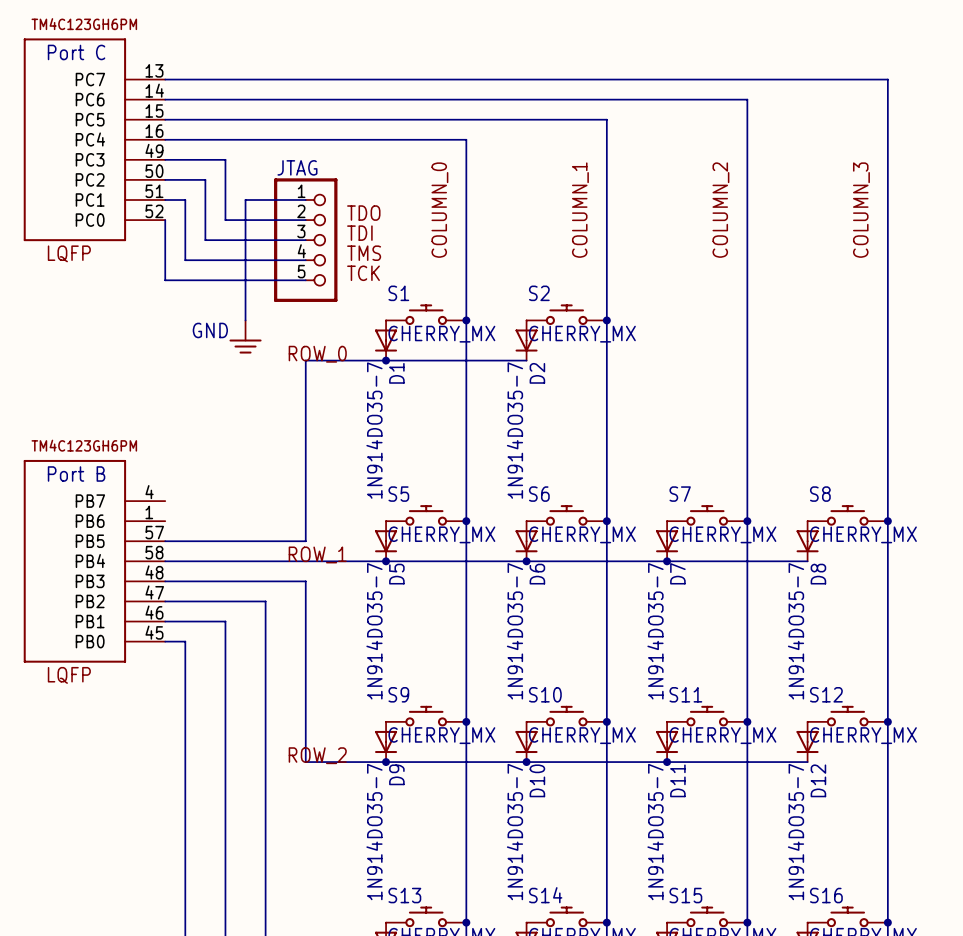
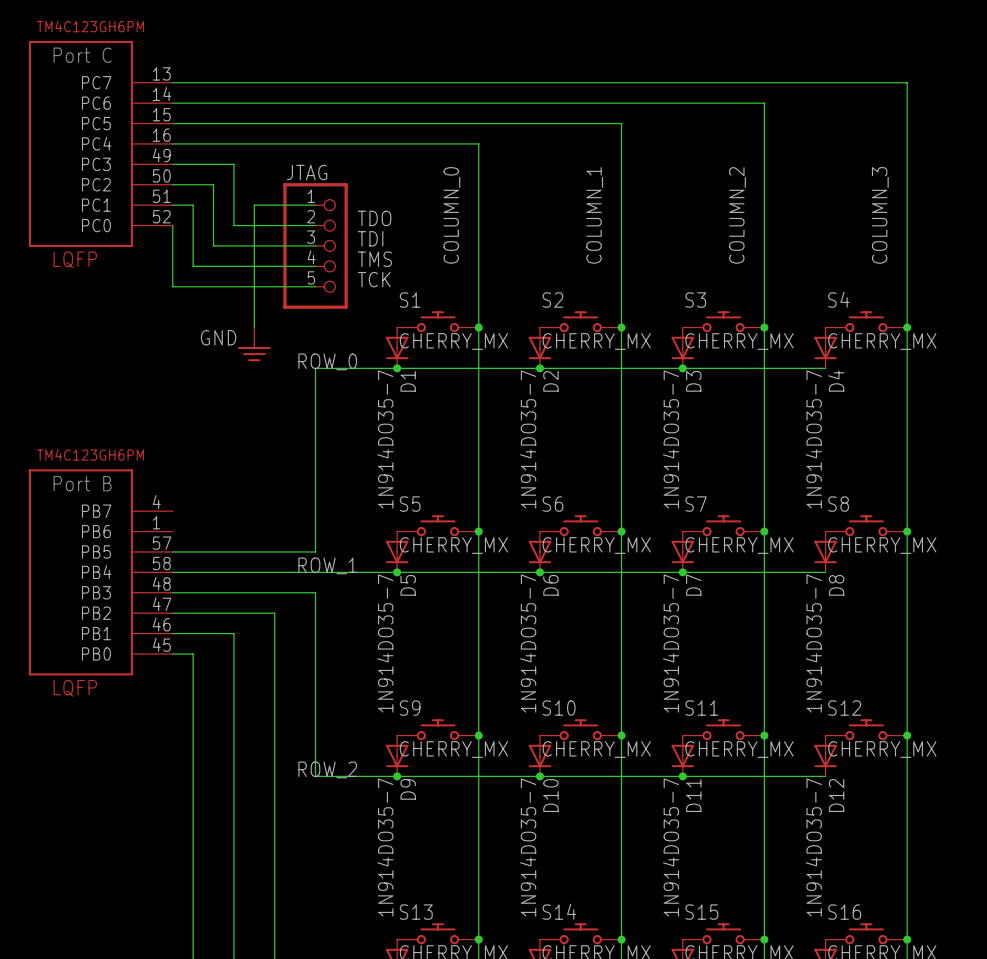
S3: none -> CHERRY_MX (723, 321)
S4: none -> CHERRY_MX (866, 321)
junction: none -> (764, 327)
junction: none -> (907, 327)
D3: none -> 1N914DO35-7 (682, 347)
D4: none -> 1N914DO35-7 (825, 347)
wire: none -> (539, 368) (825, 368)
junction: none -> (539, 368)
junction: none -> (682, 368)

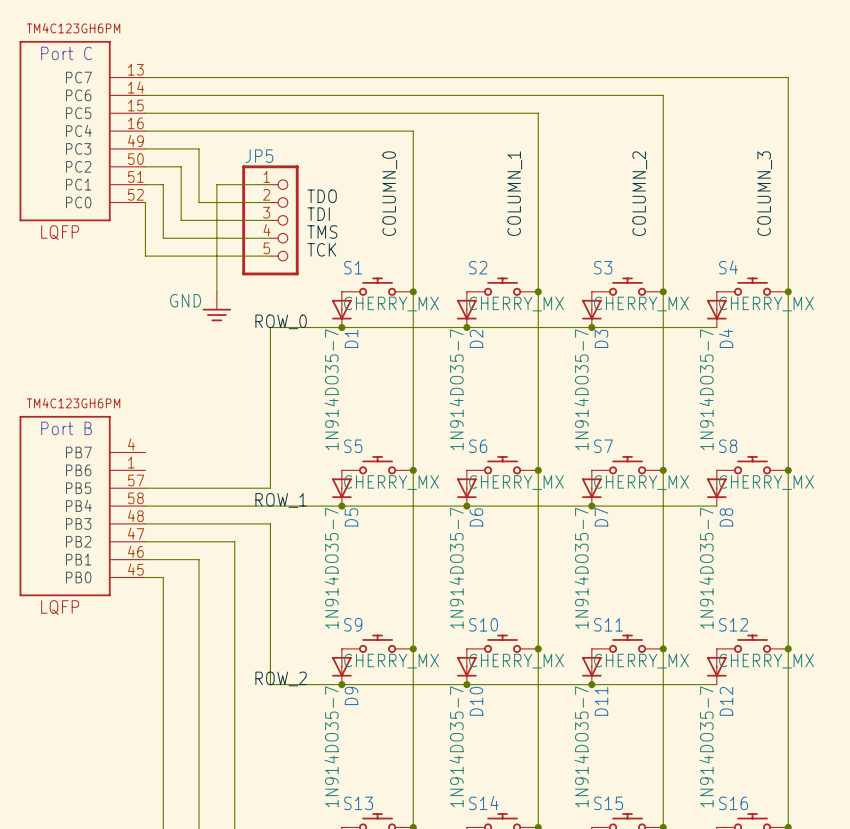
JTAG name: JTAG (307, 172) -> JP5 (259, 156)

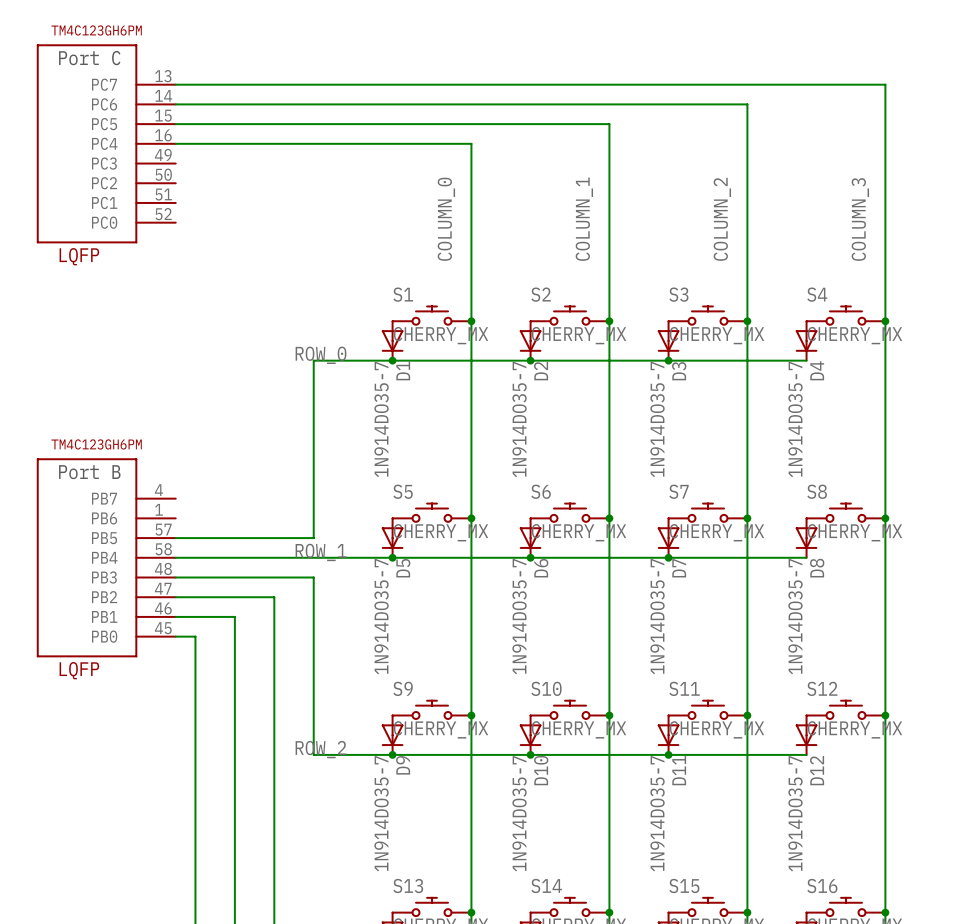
wire: (145, 148) (199, 148) (199, 202) (270, 202) -> none
wire: (145, 166) (181, 166) (181, 220) (270, 220) -> none
wire: (145, 184) (163, 184) (163, 238) (270, 238) -> none
wire: (270, 184) (216, 184) (216, 291) -> none
label: TDO (322, 196) -> none
wire: (145, 202) (145, 256) (270, 256) -> none
label: TDI (318, 214) -> none
JP5: (270, 220) -> none
label: TMS (322, 231) -> none
label: TCK (321, 249) -> none
power symbol: GND (216, 306) -> none

